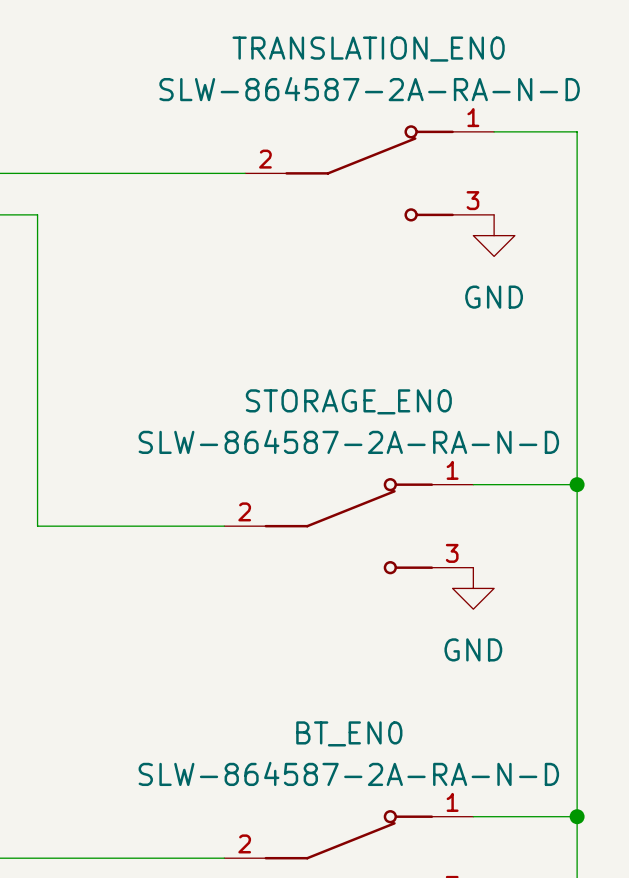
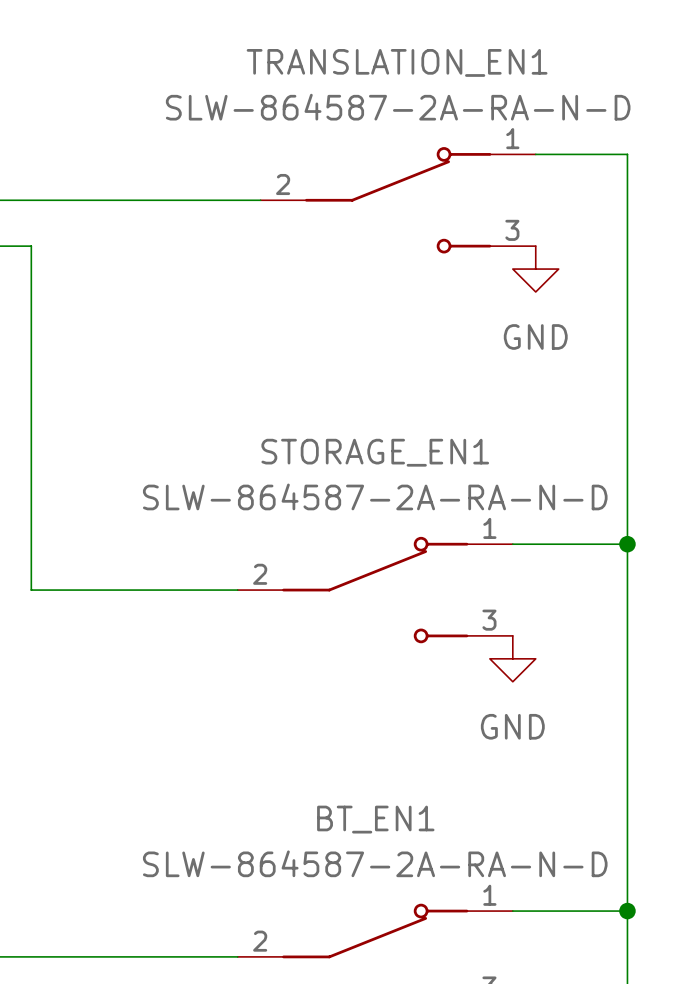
TRANSLATION_EN0 name: TRANSLATION_EN0 (368, 49) -> TRANSLATION_EN1 (397, 62)
STORAGE_EN0 name: STORAGE_EN0 (348, 401) -> STORAGE_EN1 (375, 452)
BT_EN0 name: BT_EN0 (349, 733) -> BT_EN1 (375, 819)

